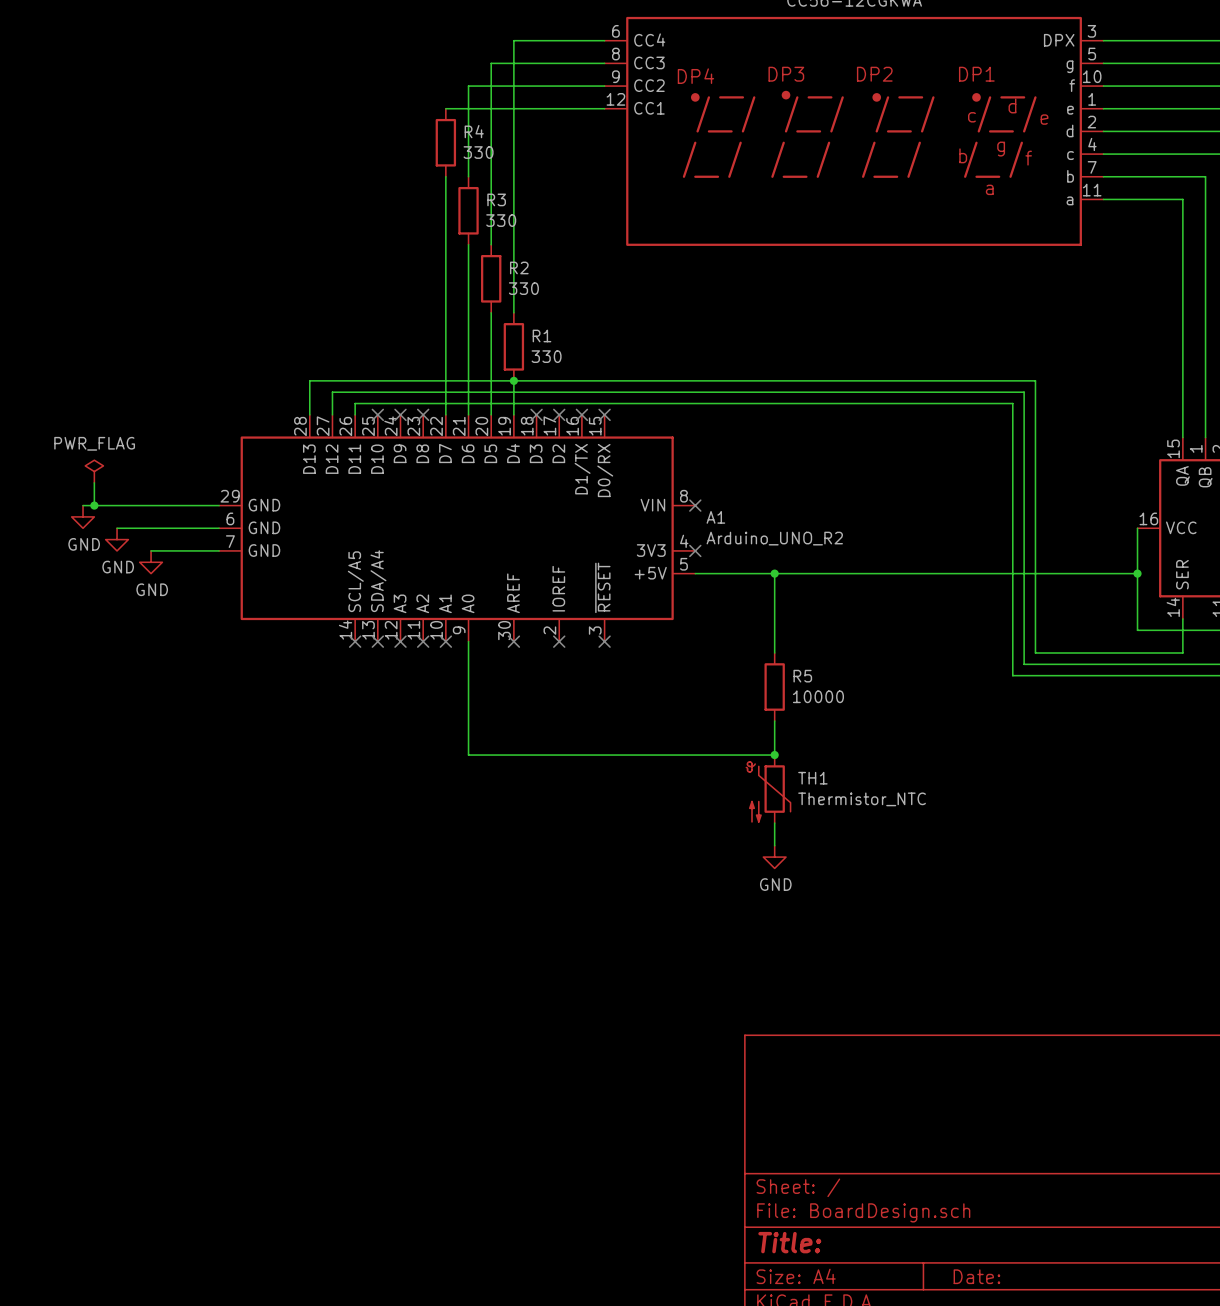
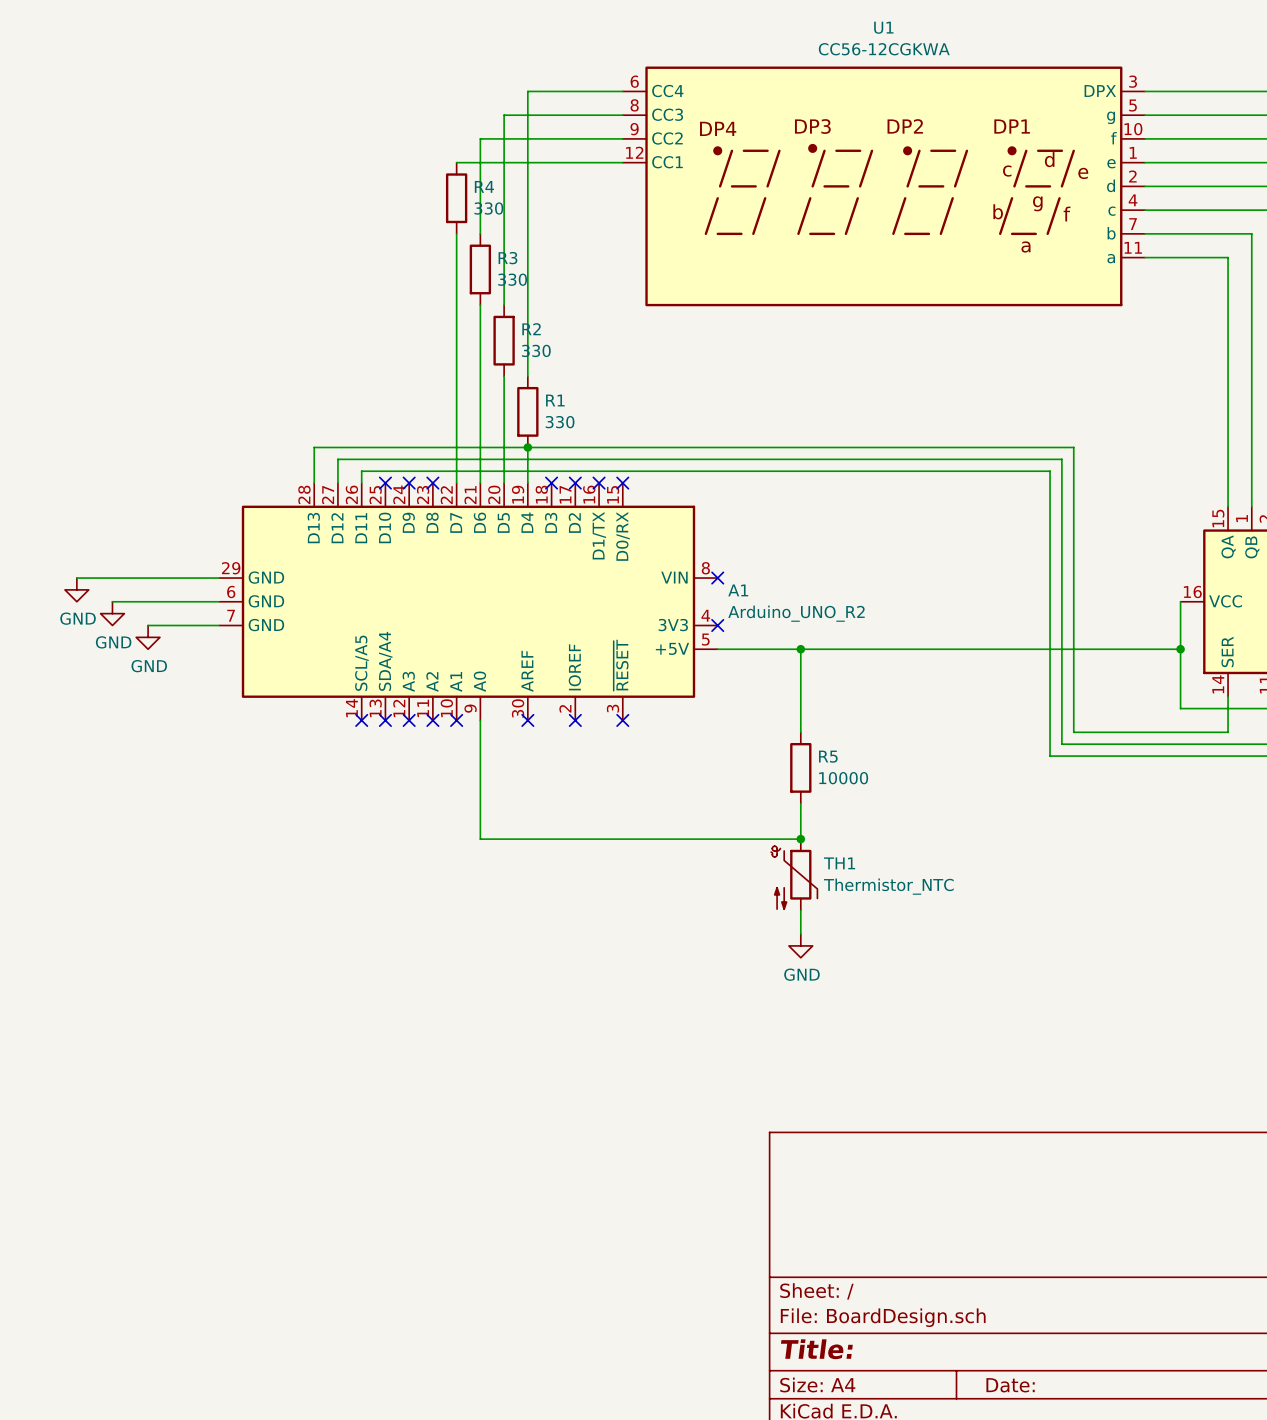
power symbol: PWR_FLAG (94, 471) -> none
wire: (94, 482) (94, 505) -> none
junction: (94, 505) -> none

